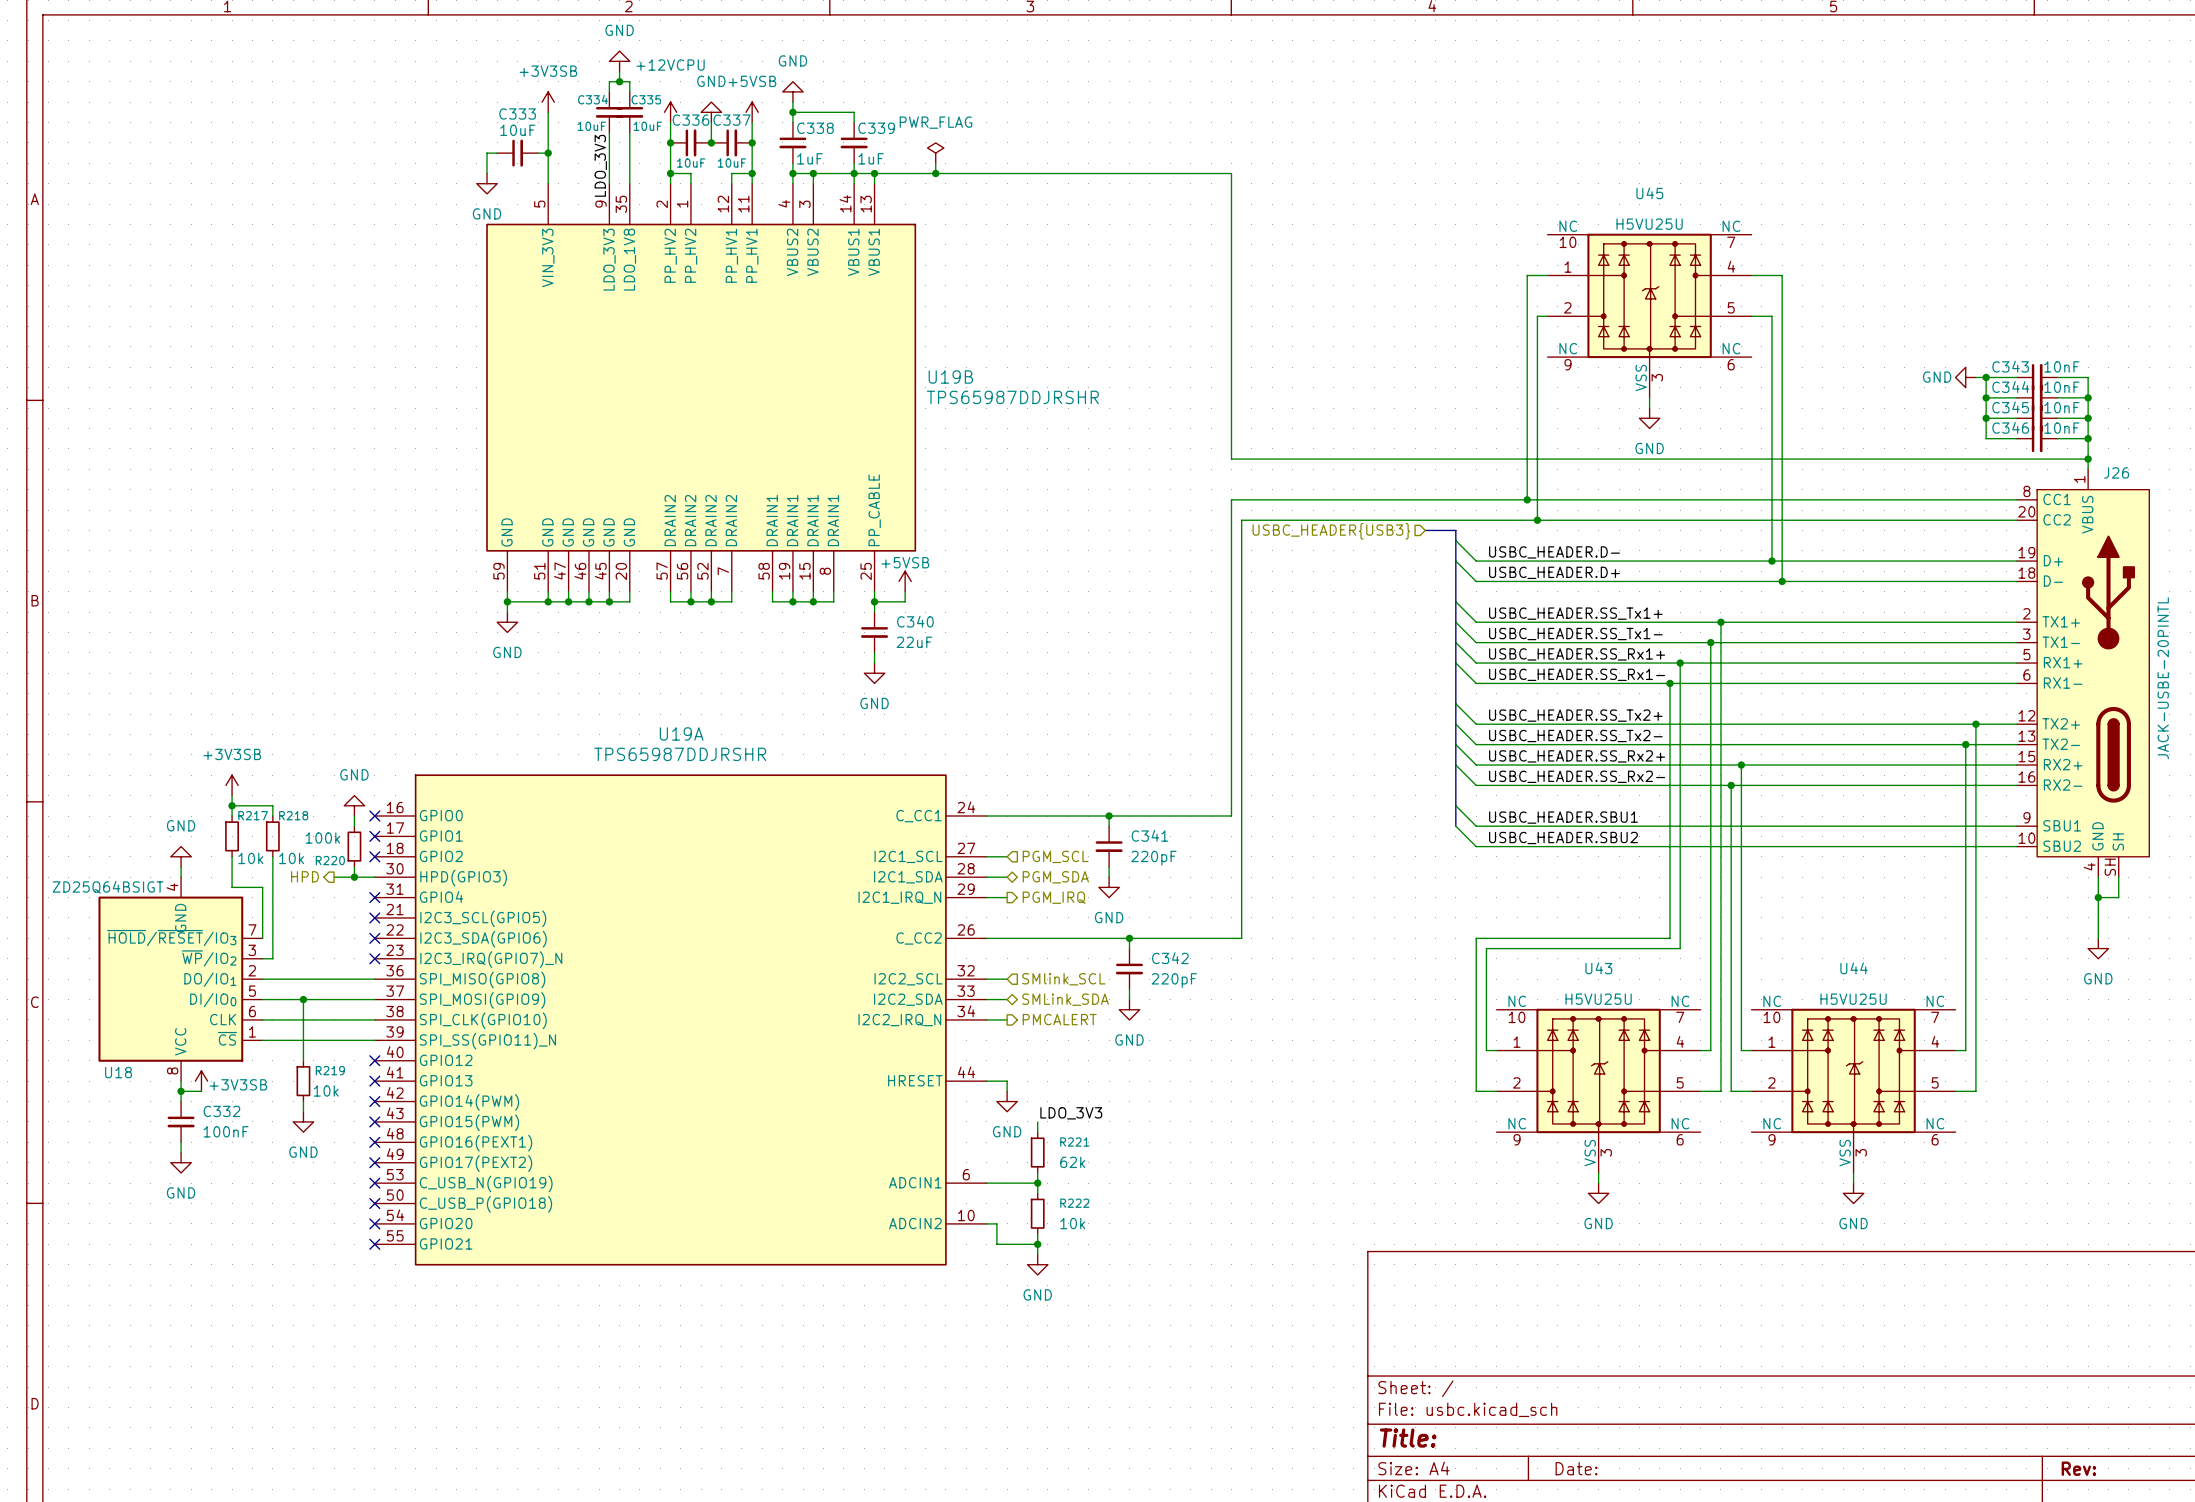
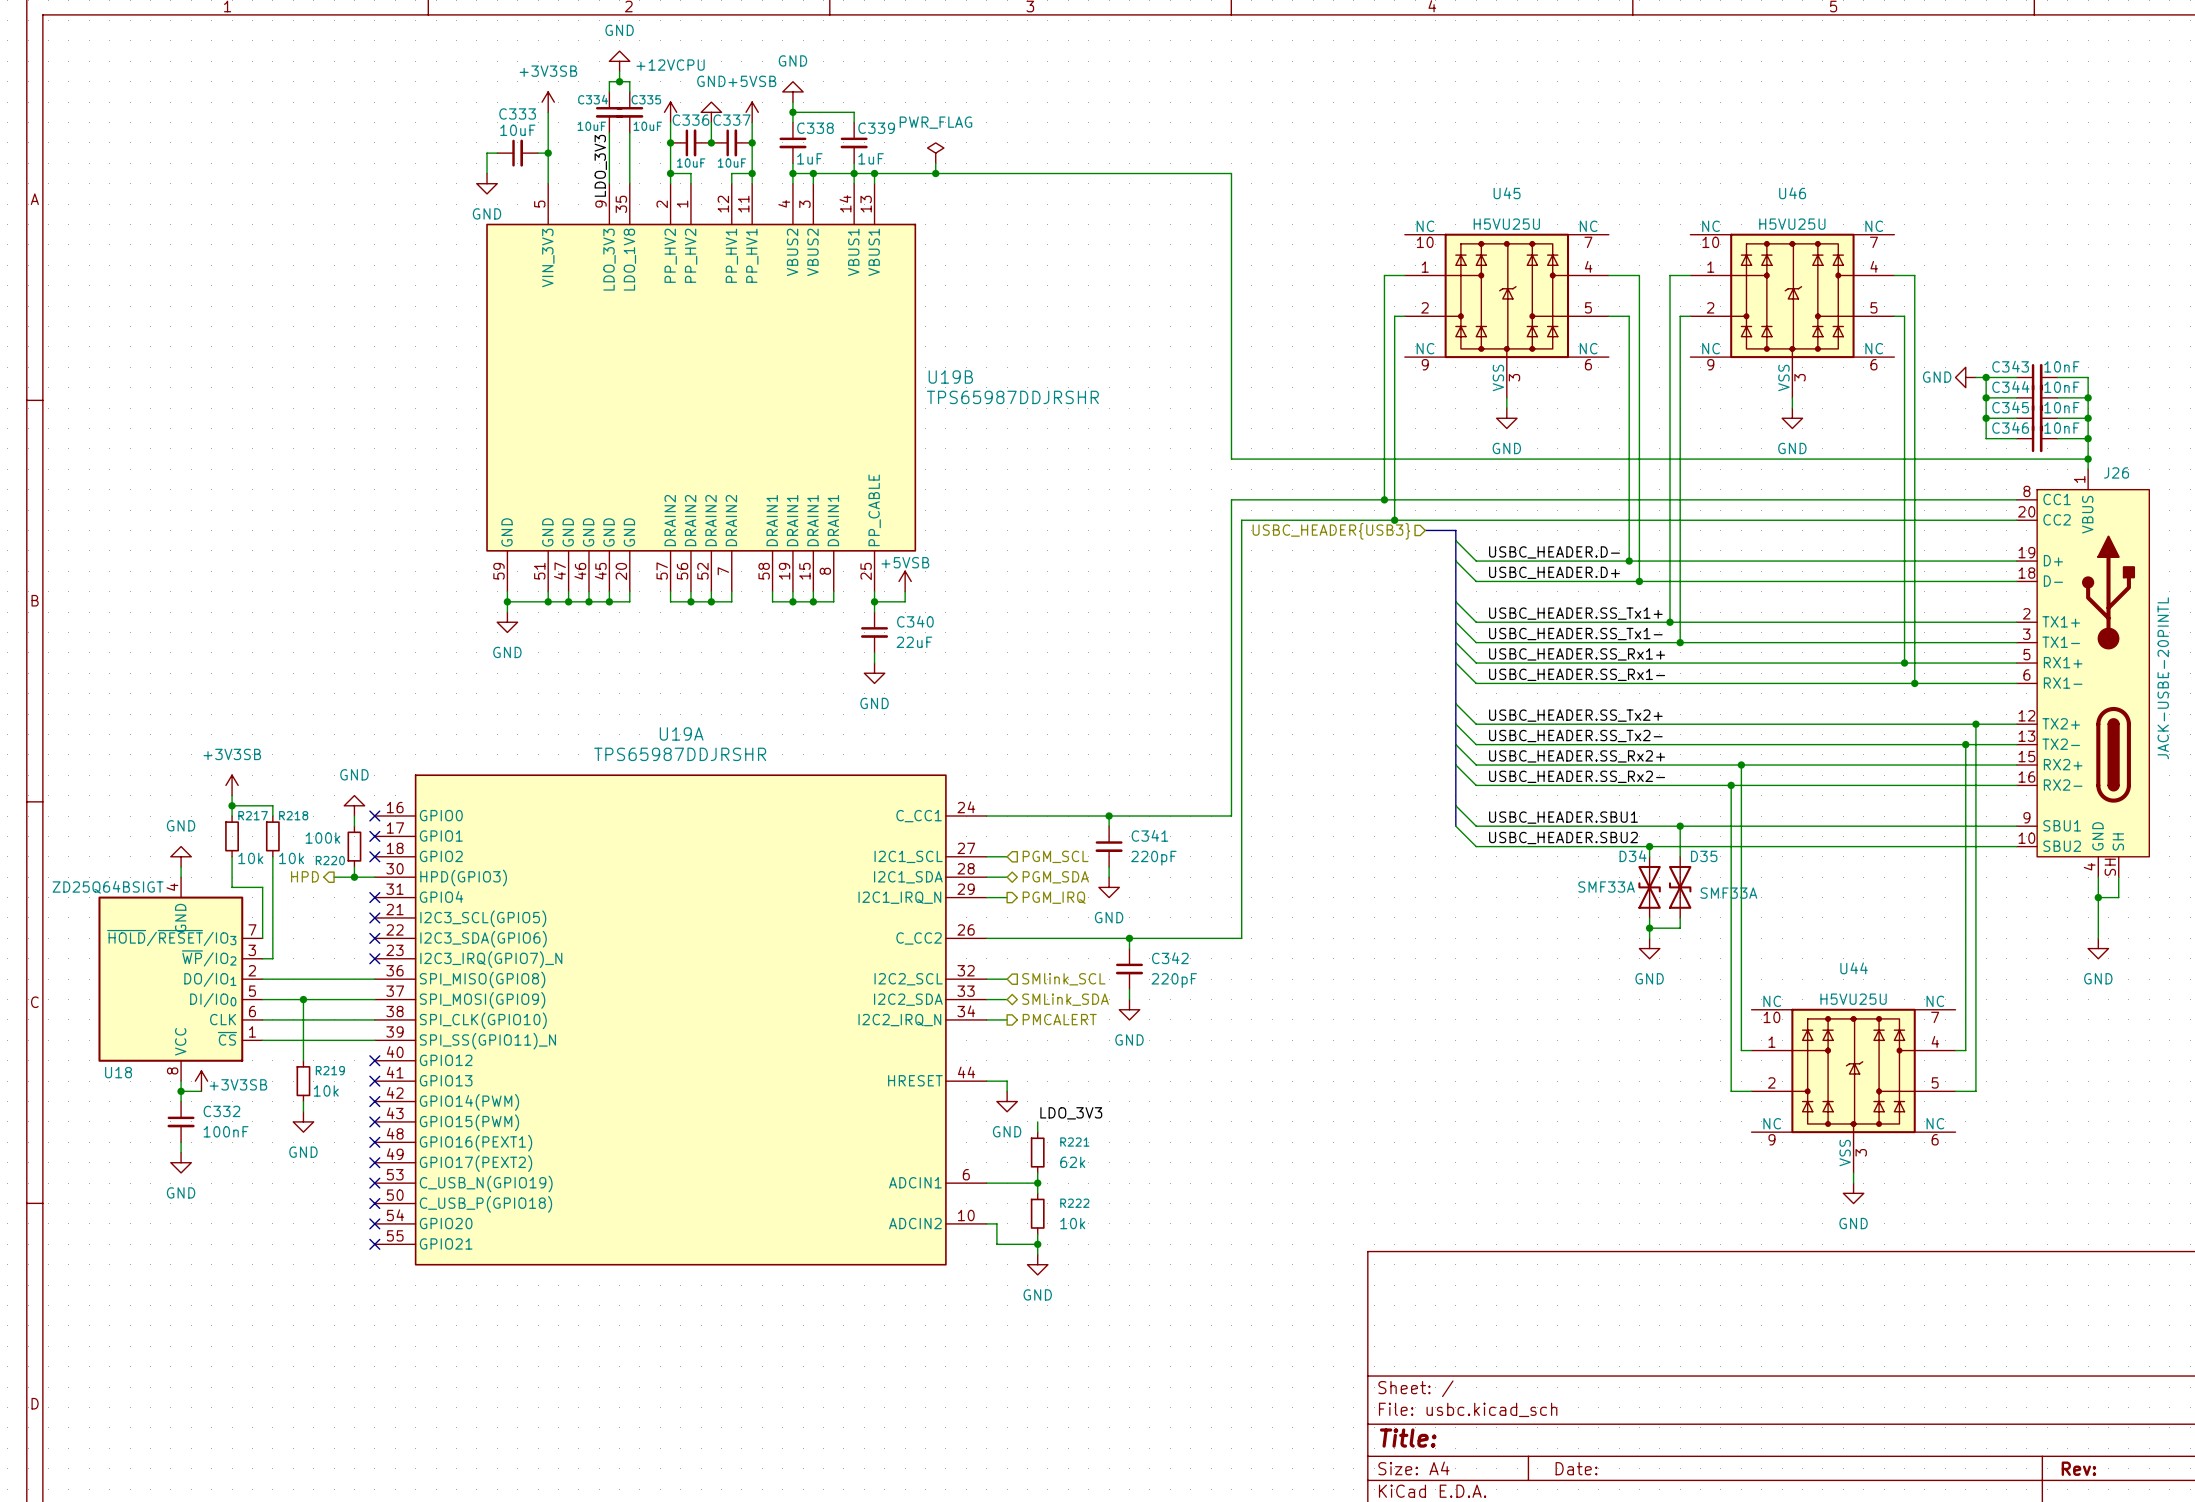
wire: (1547, 275) (1527, 275) (1527, 499) -> (1404, 275) (1384, 275) (1384, 499)
wire: none -> (1690, 275) (1669, 275) (1669, 622)
wire: (1751, 275) (1782, 275) (1782, 581) -> (1608, 275) (1639, 275) (1639, 581)
wire: none -> (1894, 275) (1914, 275) (1914, 683)
U45 position: (1649, 315) -> (1506, 315)
U46: none -> H5VU25U (1792, 315)
wire: (1547, 316) (1537, 316) (1537, 520) -> (1404, 316) (1394, 316) (1394, 520)
wire: none -> (1690, 316) (1680, 316) (1680, 642)
wire: (1751, 316) (1771, 316) (1771, 561) -> (1608, 316) (1629, 316) (1629, 561)
wire: none -> (1894, 316) (1904, 316) (1904, 663)
wire: (1649, 397) (1649, 408) -> (1506, 397) (1506, 408)
wire: none -> (1792, 397) (1792, 408)
power symbol: none -> GND (1506, 418)
power symbol: GND (1649, 418) -> none
power symbol: none -> GND (1792, 418)
junction: none -> (1384, 499)
junction: (1527, 499) -> none
junction: none -> (1394, 520)
junction: (1537, 520) -> none
junction: none -> (1629, 561)
junction: (1771, 561) -> none
junction: none -> (1639, 581)
junction: (1782, 581) -> none
junction: none -> (1669, 622)
wire: (1720, 622) (1720, 1091) (1700, 1091) -> none
junction: (1720, 622) -> none
junction: none -> (1680, 642)
wire: (1710, 642) (1710, 1050) (1700, 1050) -> none
junction: (1710, 642) -> none
wire: (1680, 663) (1680, 826) -> none
junction: (1680, 663) -> none
junction: none -> (1904, 663)
wire: (1669, 683) (1669, 938) (1476, 938) (1476, 1091) (1496, 1091) -> none
junction: (1669, 683) -> none
junction: none -> (1914, 683)
junction: none -> (1680, 826)
wire: none -> (1649, 846) (1649, 856)
junction: none -> (1649, 846)
D34: none -> SMF33A (1649, 887)
D35: none -> SMF33A (1680, 887)
wire: none -> (1649, 917) (1649, 938)
junction: none -> (1649, 928)
wire: (1680, 928) (1680, 948) (1486, 948) (1486, 1050) (1496, 1050) -> (1680, 928) (1649, 928)
power symbol: none -> GND (1649, 948)
U43: H5VU25U (1598, 1090) -> none
wire: (1598, 1172) (1598, 1183) -> none
power symbol: GND (1598, 1193) -> none

